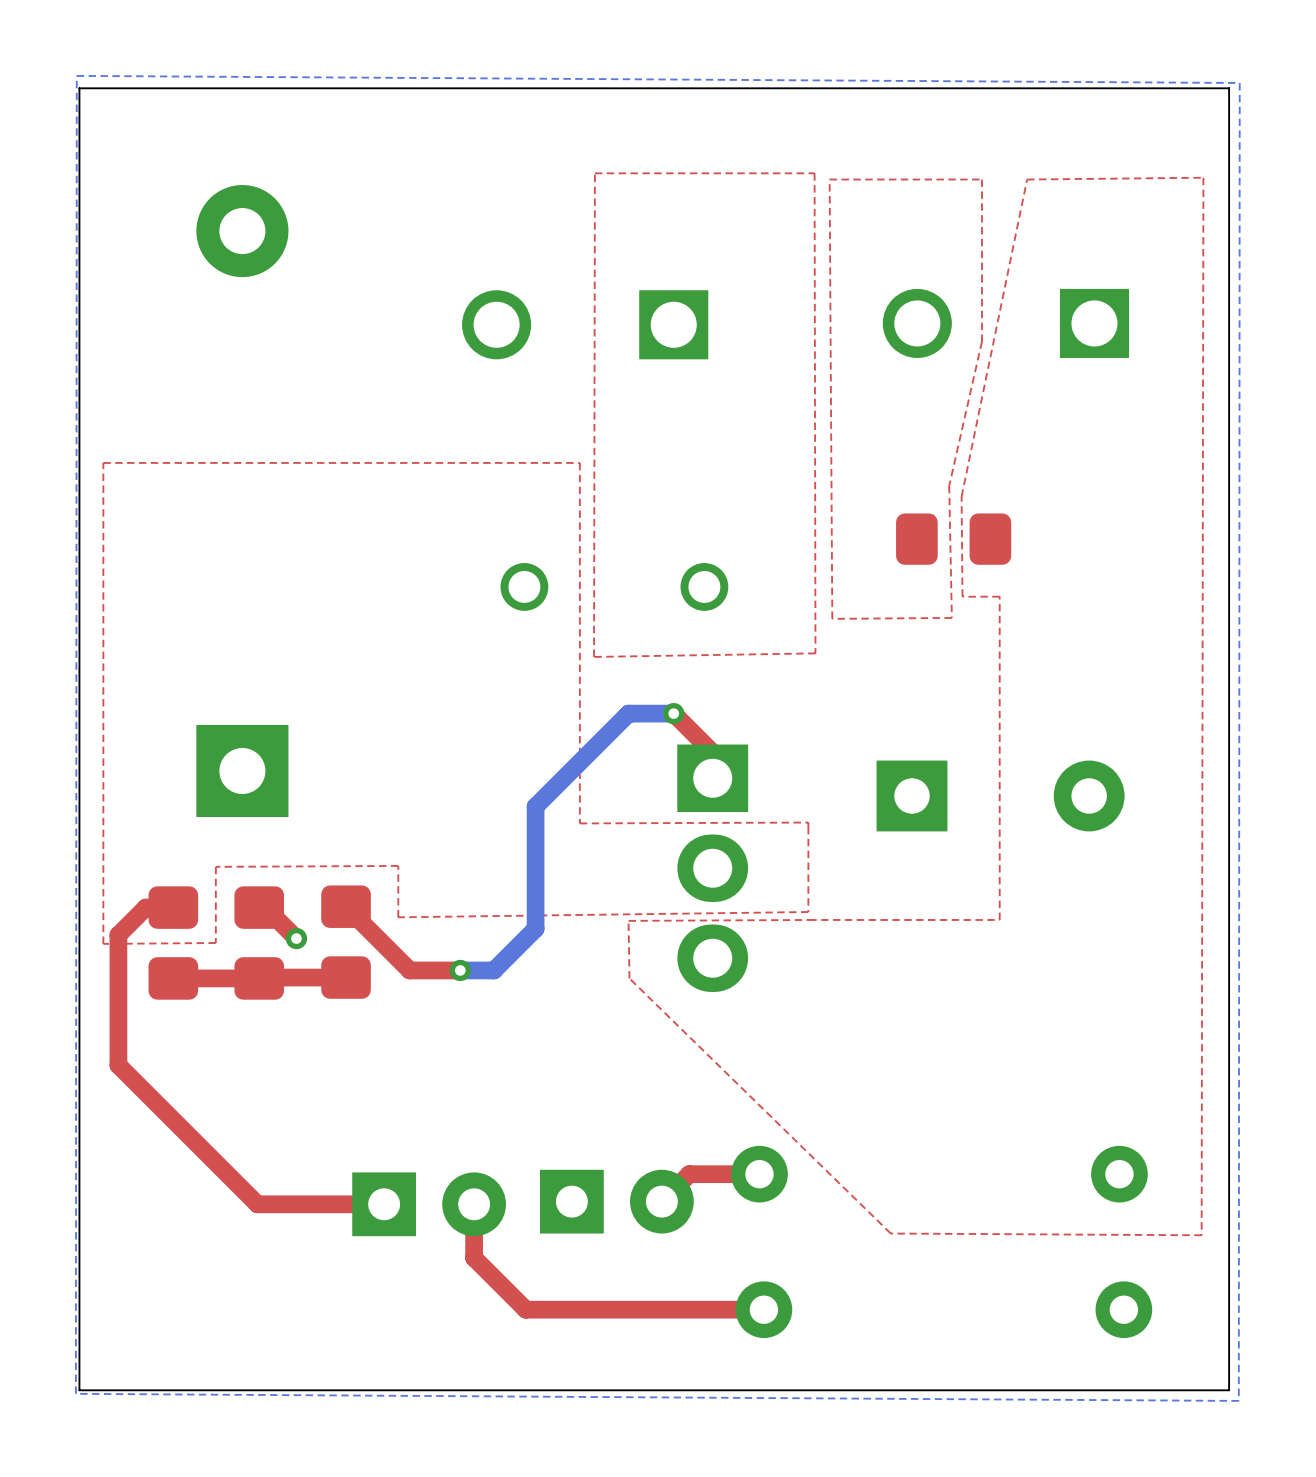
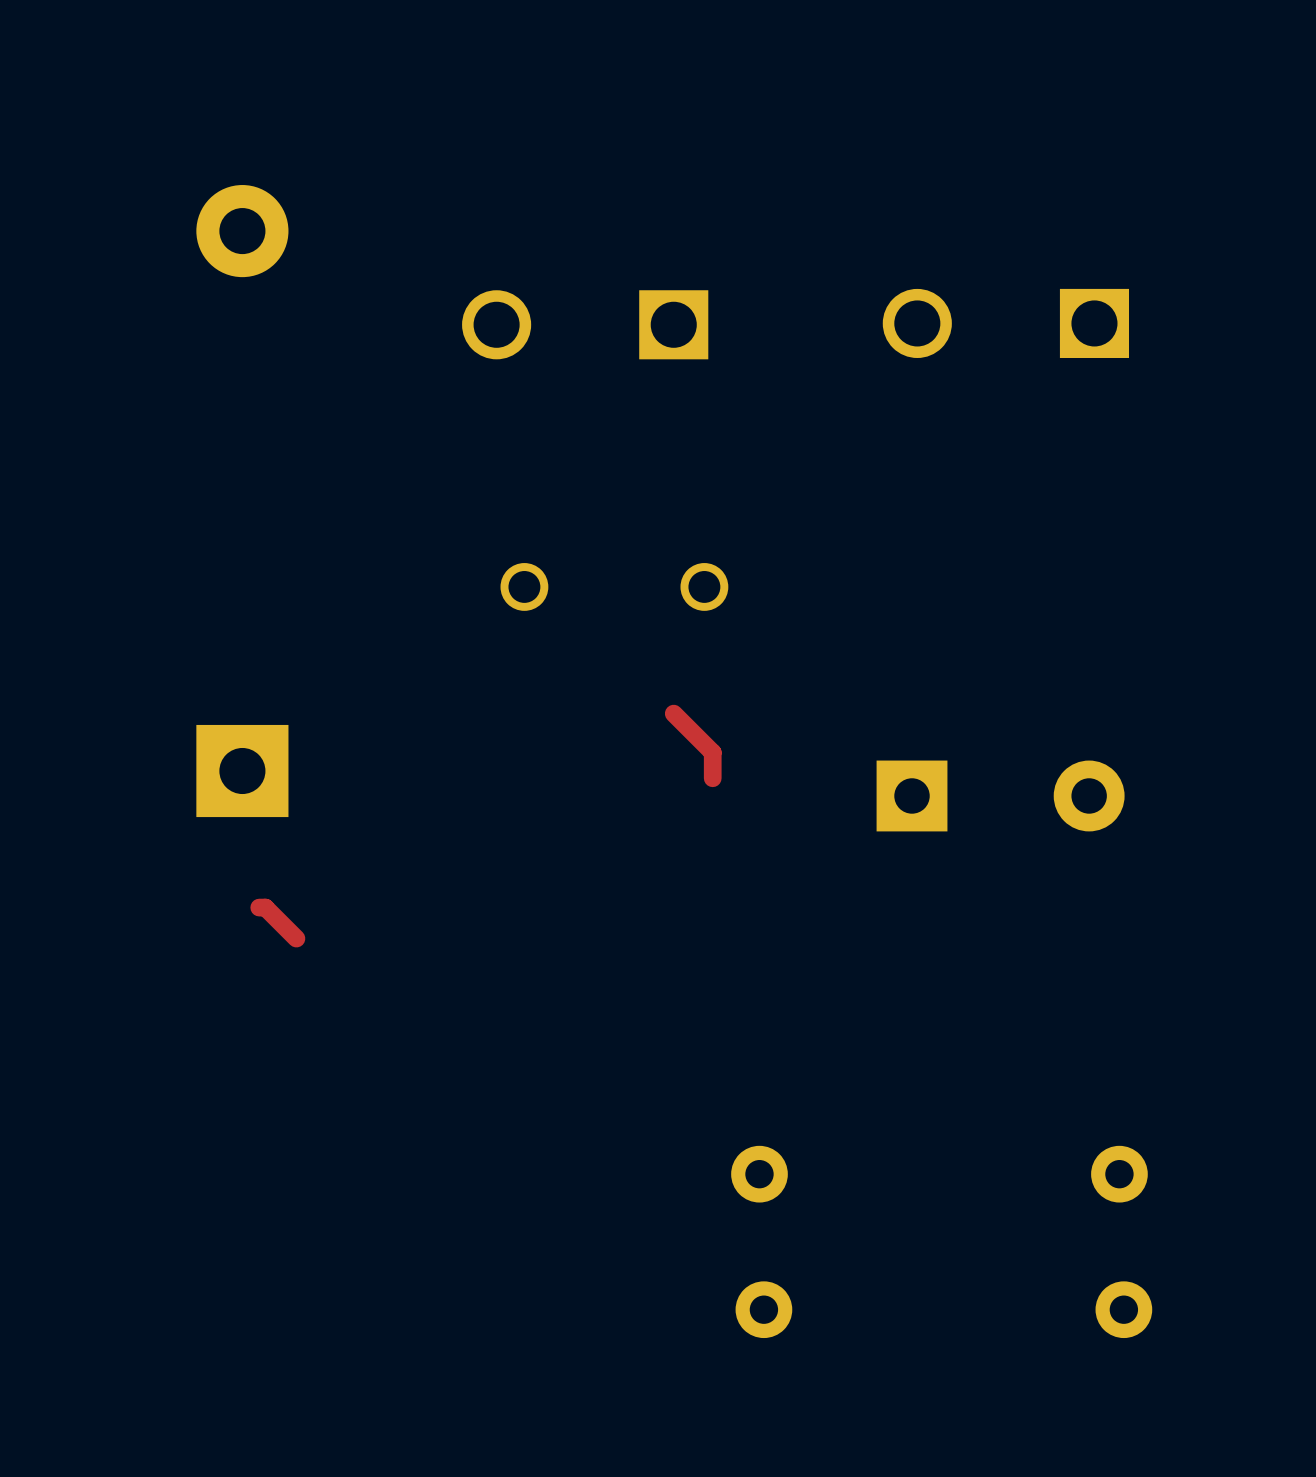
bottom zone outline: (76, 75) (75, 1393) (1238, 1400) (1239, 82) (76, 75) -> none
board edge: (1229, 88) (79, 88) (79, 1390) (1229, 1390) (1229, 88) -> none
top zone outline: (814, 173) (594, 173) (594, 656) (815, 653) (814, 173) -> none
top zone outline: (1203, 177) (1027, 179) (961, 496) (962, 596) (999, 596) (999, 919) (628, 920) (629, 978) (890, 1233) (1201, 1235) (1203, 177) -> none
top zone outline: (981, 179) (981, 341) (949, 485) (951, 617) (832, 618) (829, 179) (981, 179) -> none
top zone outline: (579, 462) (103, 462) (103, 943) (215, 943) (215, 866) (398, 865) (398, 917) (808, 912) (808, 822) (579, 823) (579, 462) -> none
part: (953, 539) -> none
bottom track: (673, 713) (628, 713) (535, 806) (535, 928) (493, 970) (460, 970) -> none
via: (673, 713) -> none
part: (712, 868) -> none
top track: (346, 906) (409, 970) (460, 970) -> none
top track: (173, 907) (145, 907) (118, 935) (118, 1065) (257, 1204) (384, 1204) -> none
via: (296, 938) -> none
part: (346, 942) -> none
part: (173, 943) -> none
part: (259, 943) -> none
via: (460, 970) -> none
top track: (346, 977) (173, 978) -> none
top track: (759, 1174) (689, 1174) (661, 1201) -> none
part: (616, 1201) -> none
part: (429, 1204) -> none
top track: (474, 1204) (474, 1257) (525, 1309) (763, 1309) -> none

